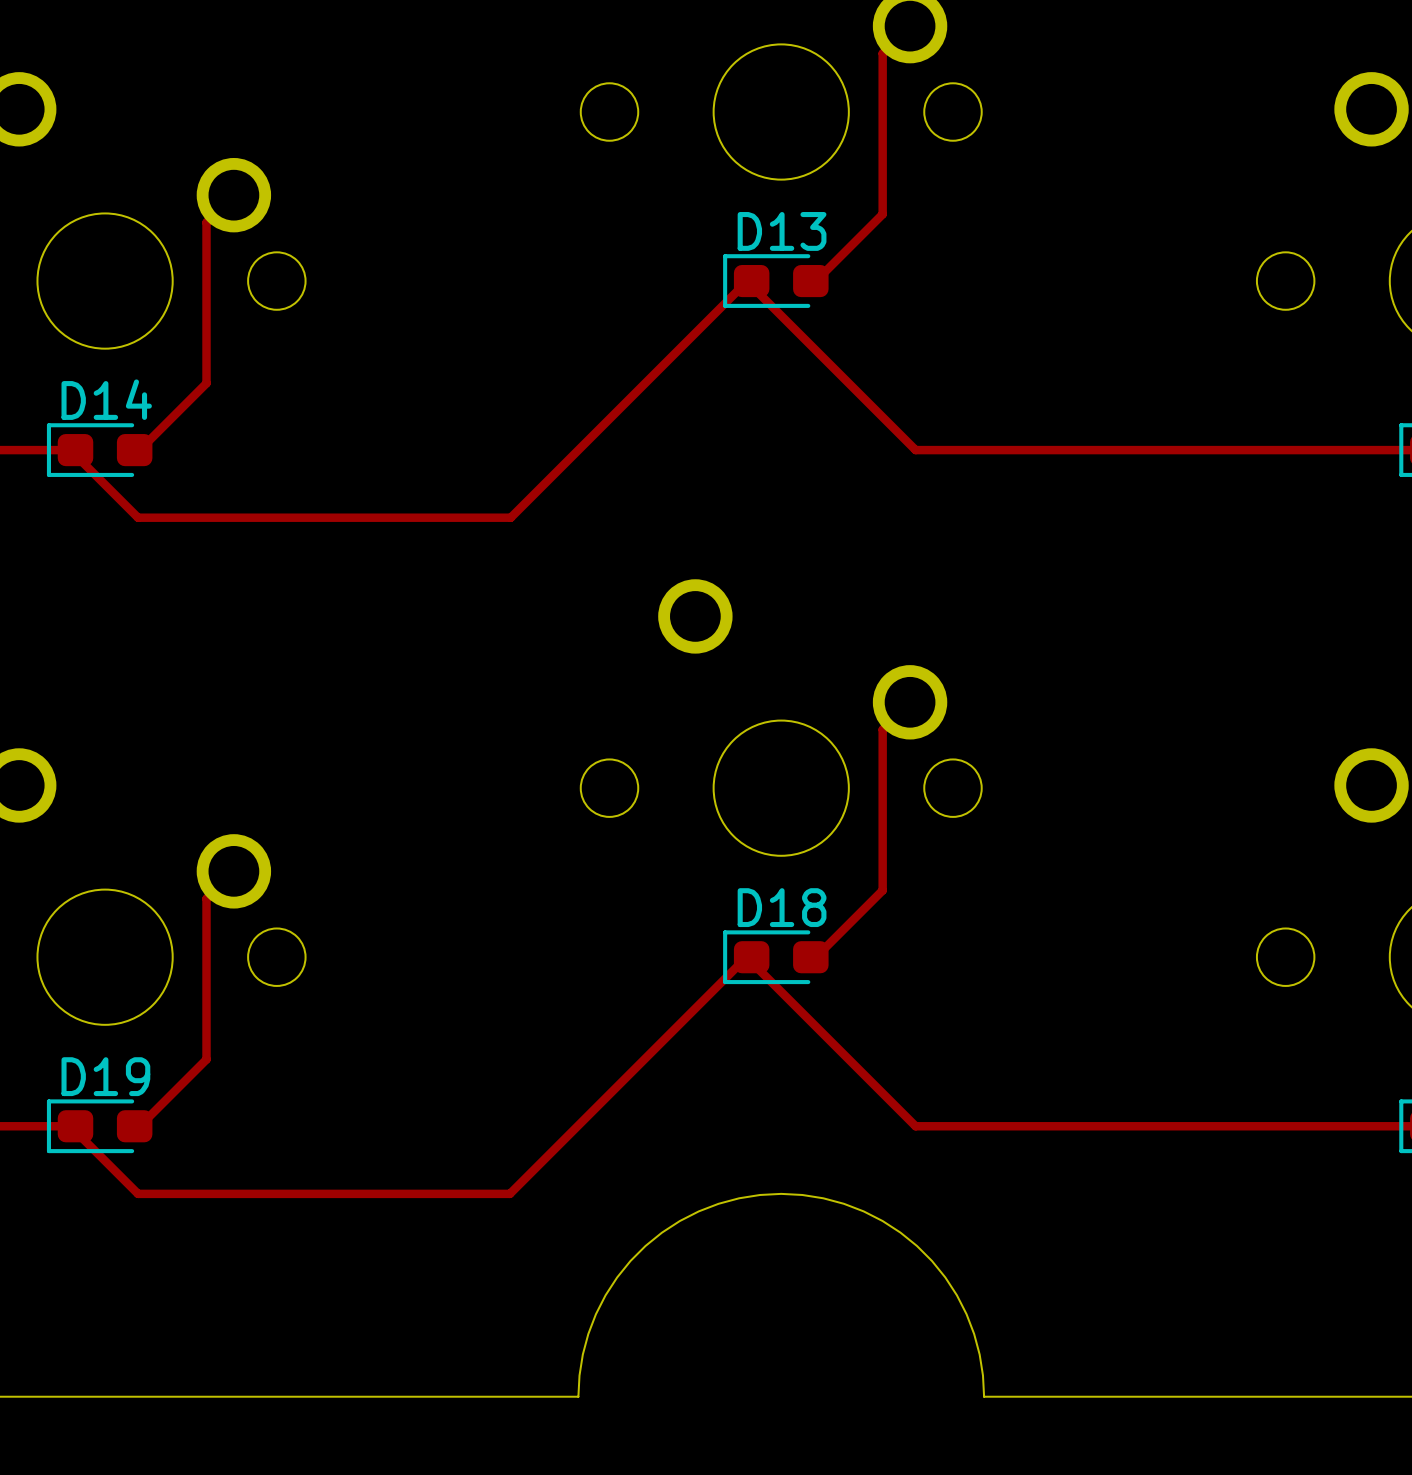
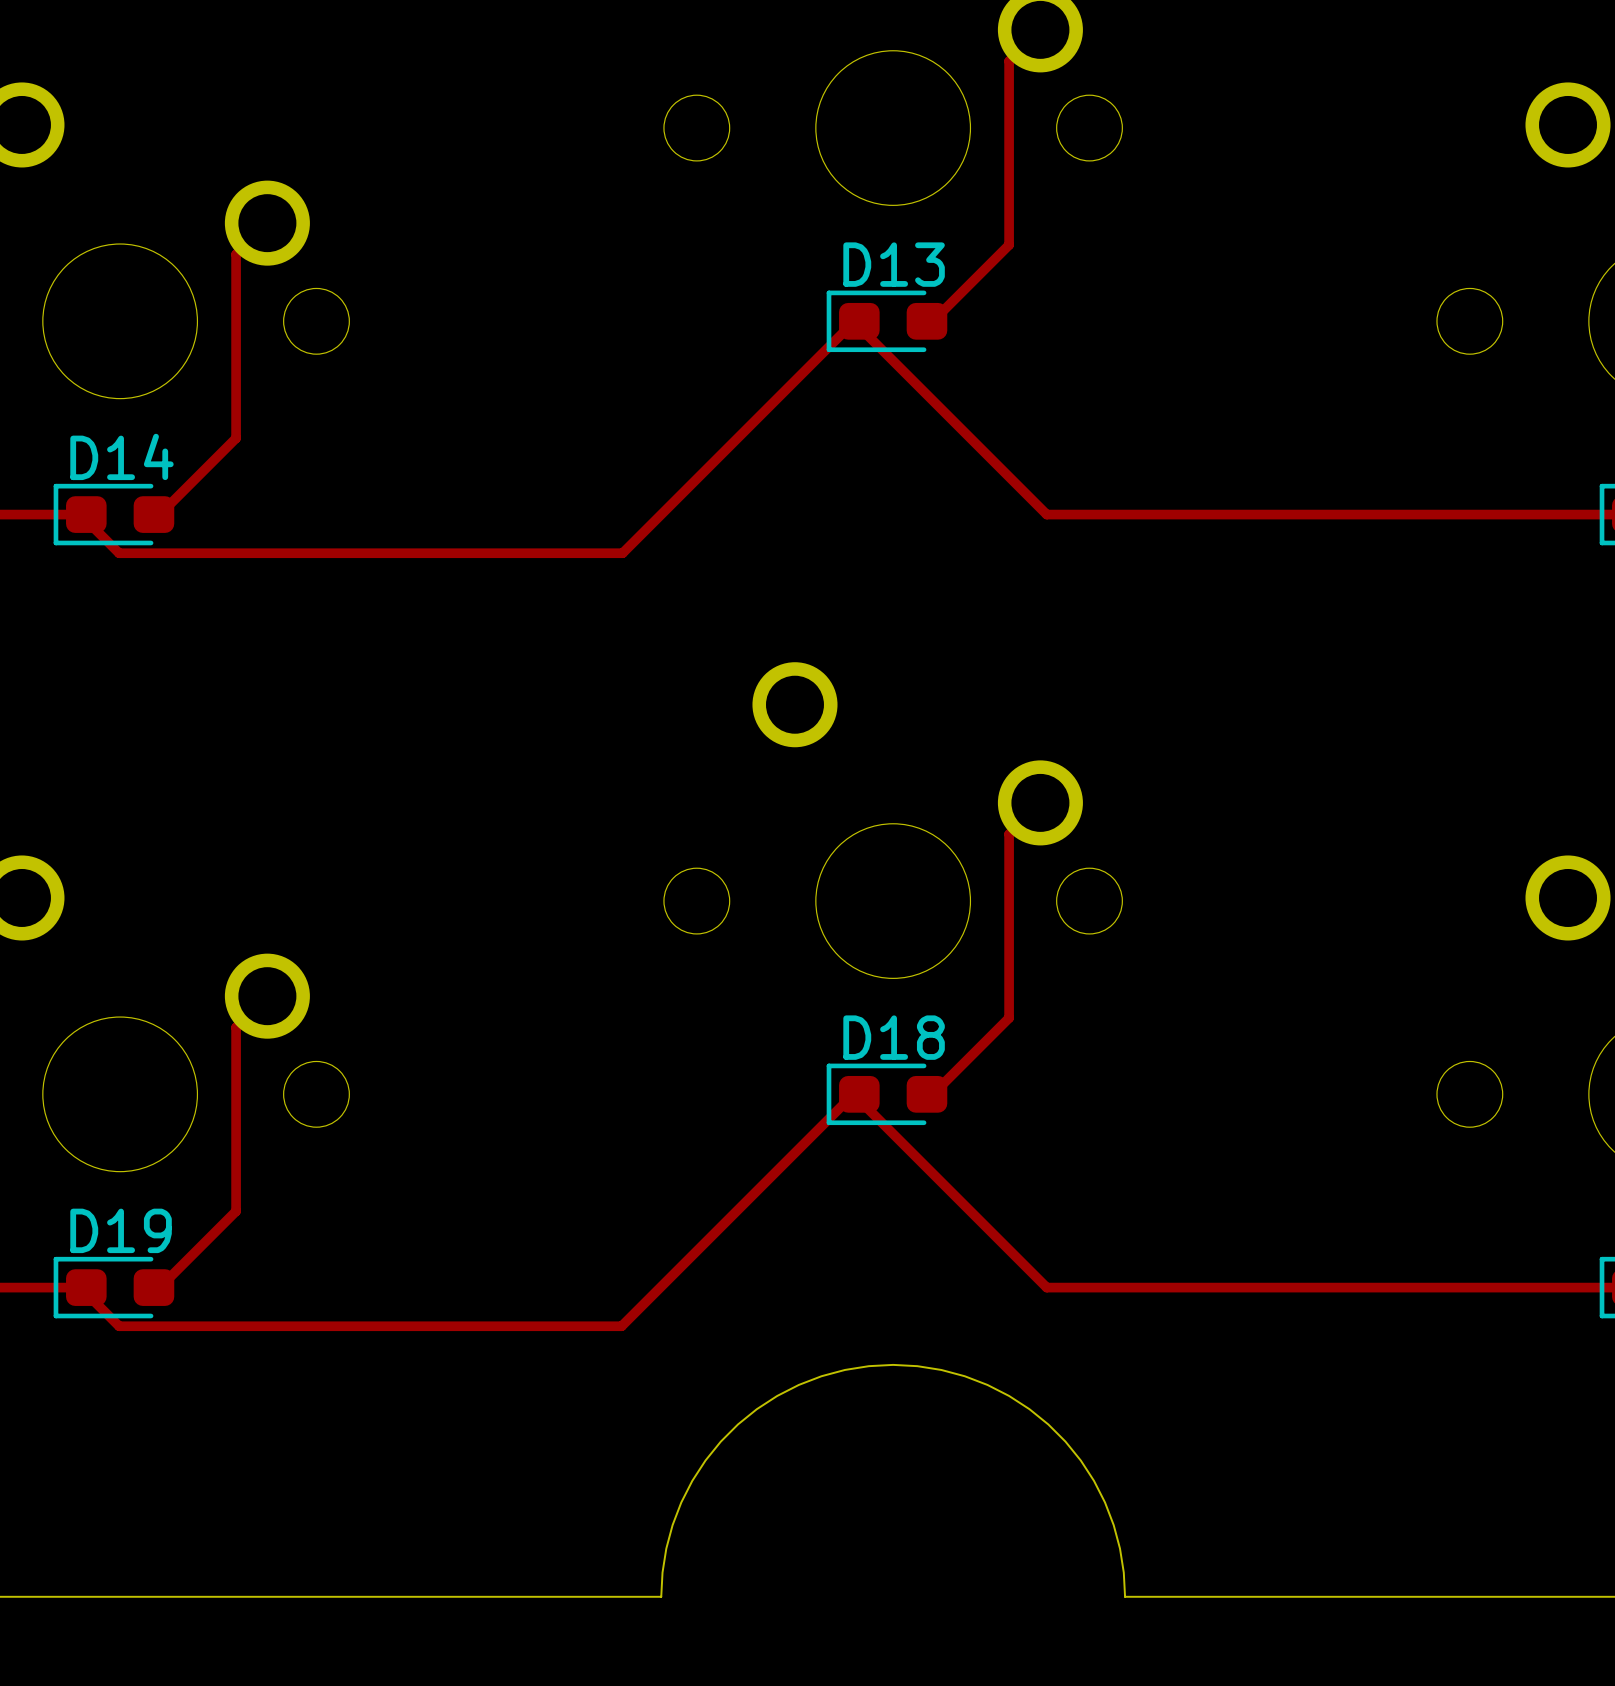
track: (104, 483) (138, 517) (510, 517) (544, 483) -> (119, 553) (622, 553)
track: (104, 1160) (138, 1193) (509, 1193) (543, 1160) -> (119, 1326) (621, 1326)

